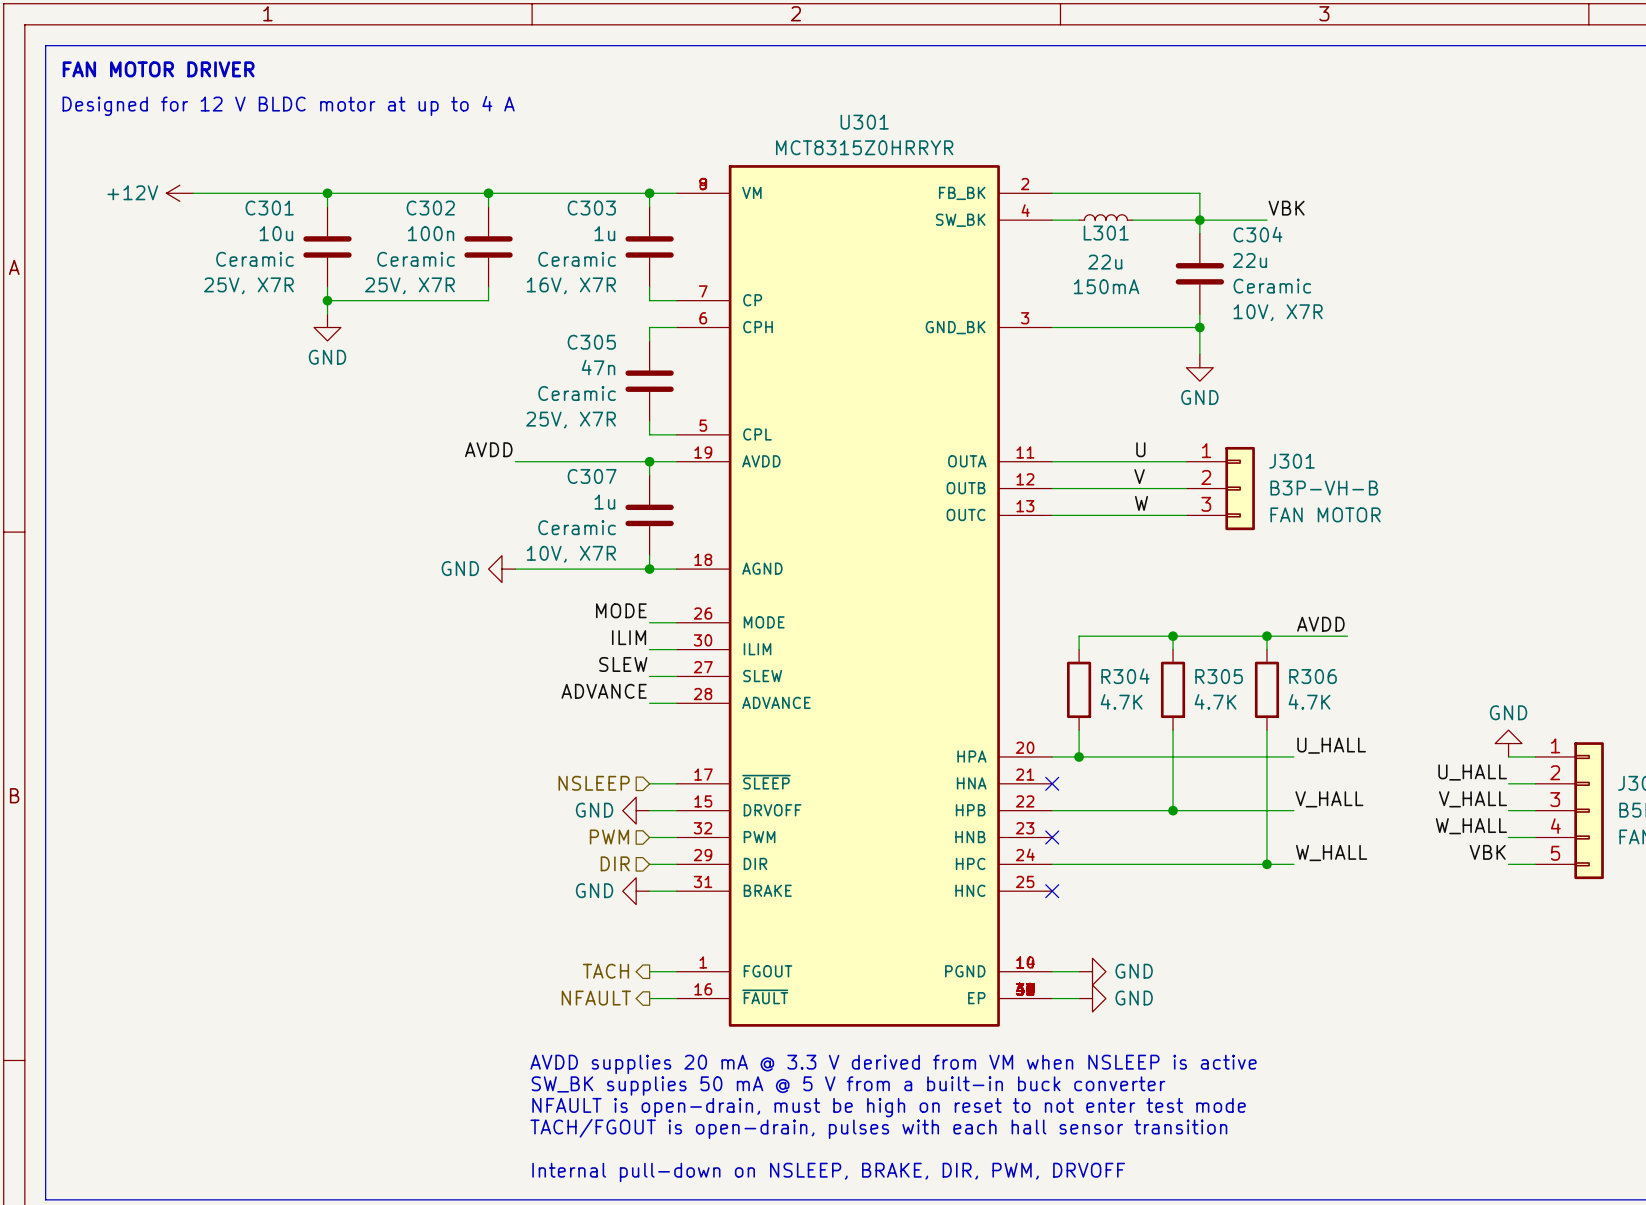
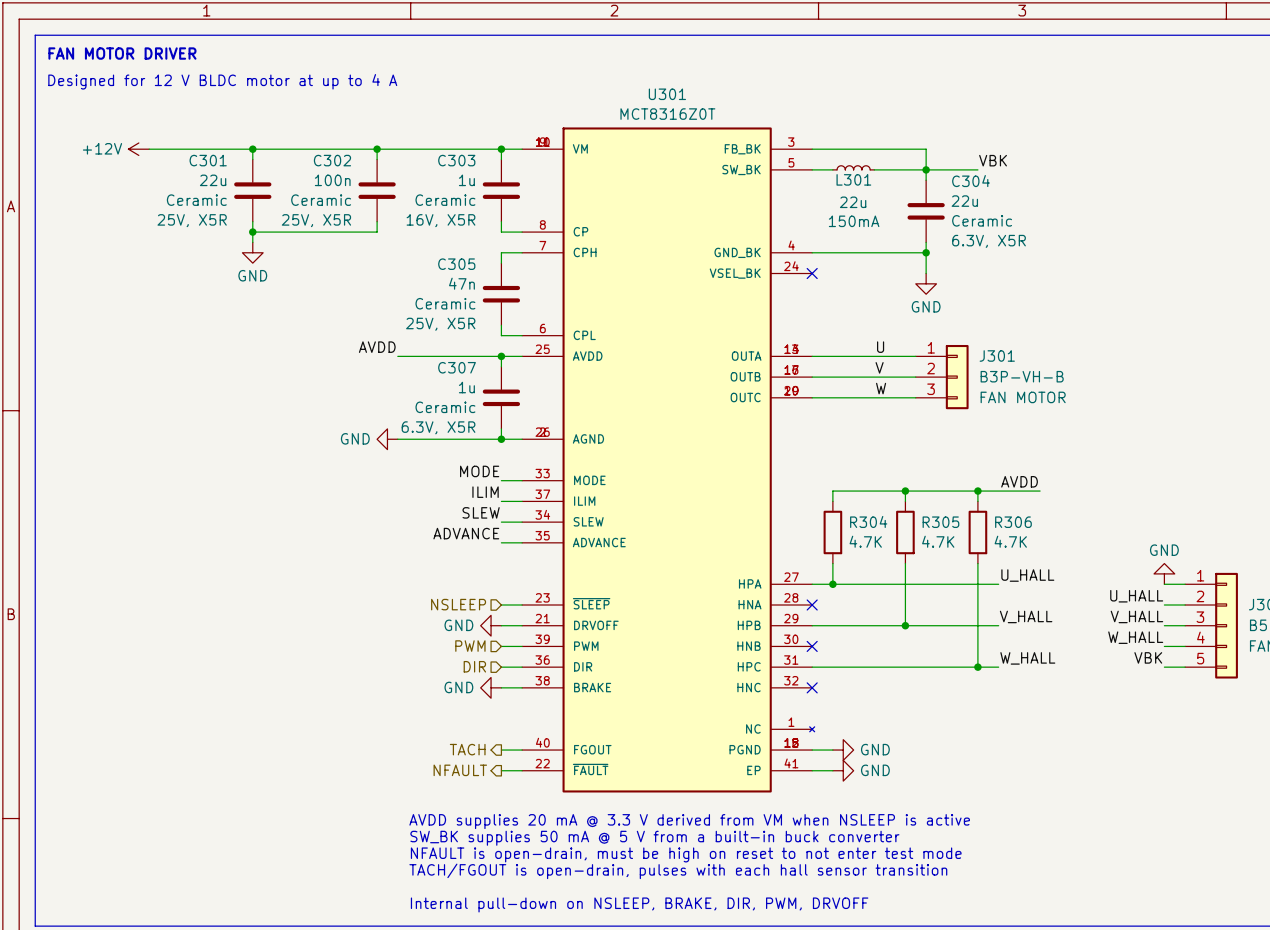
U301 value: MCT8315Z0HRRYR (864, 147) -> MCT8316Z0T (667, 114)
U301 symbol: [676, 165, 1053, 1027] -> [522, 127, 815, 793]
C301 value: 10u (276, 233) -> 22u (213, 180)
C301 text: 25V, X7R (248, 285) -> 25V, X5R (192, 220)
C302 text: 25V, X7R (409, 285) -> 25V, X5R (316, 220)
C303 text: 16V, X7R (571, 285) -> 16V, X5R (440, 220)
C304 text: 10V, X7R (1278, 312) -> 6.3V, X5R (989, 241)
no-connect mark: none -> (812, 273)
C305 text: 25V, X7R (571, 420) -> 25V, X5R (440, 324)
C307 text: 10V, X7R (571, 554) -> 6.3V, X5R (438, 427)

